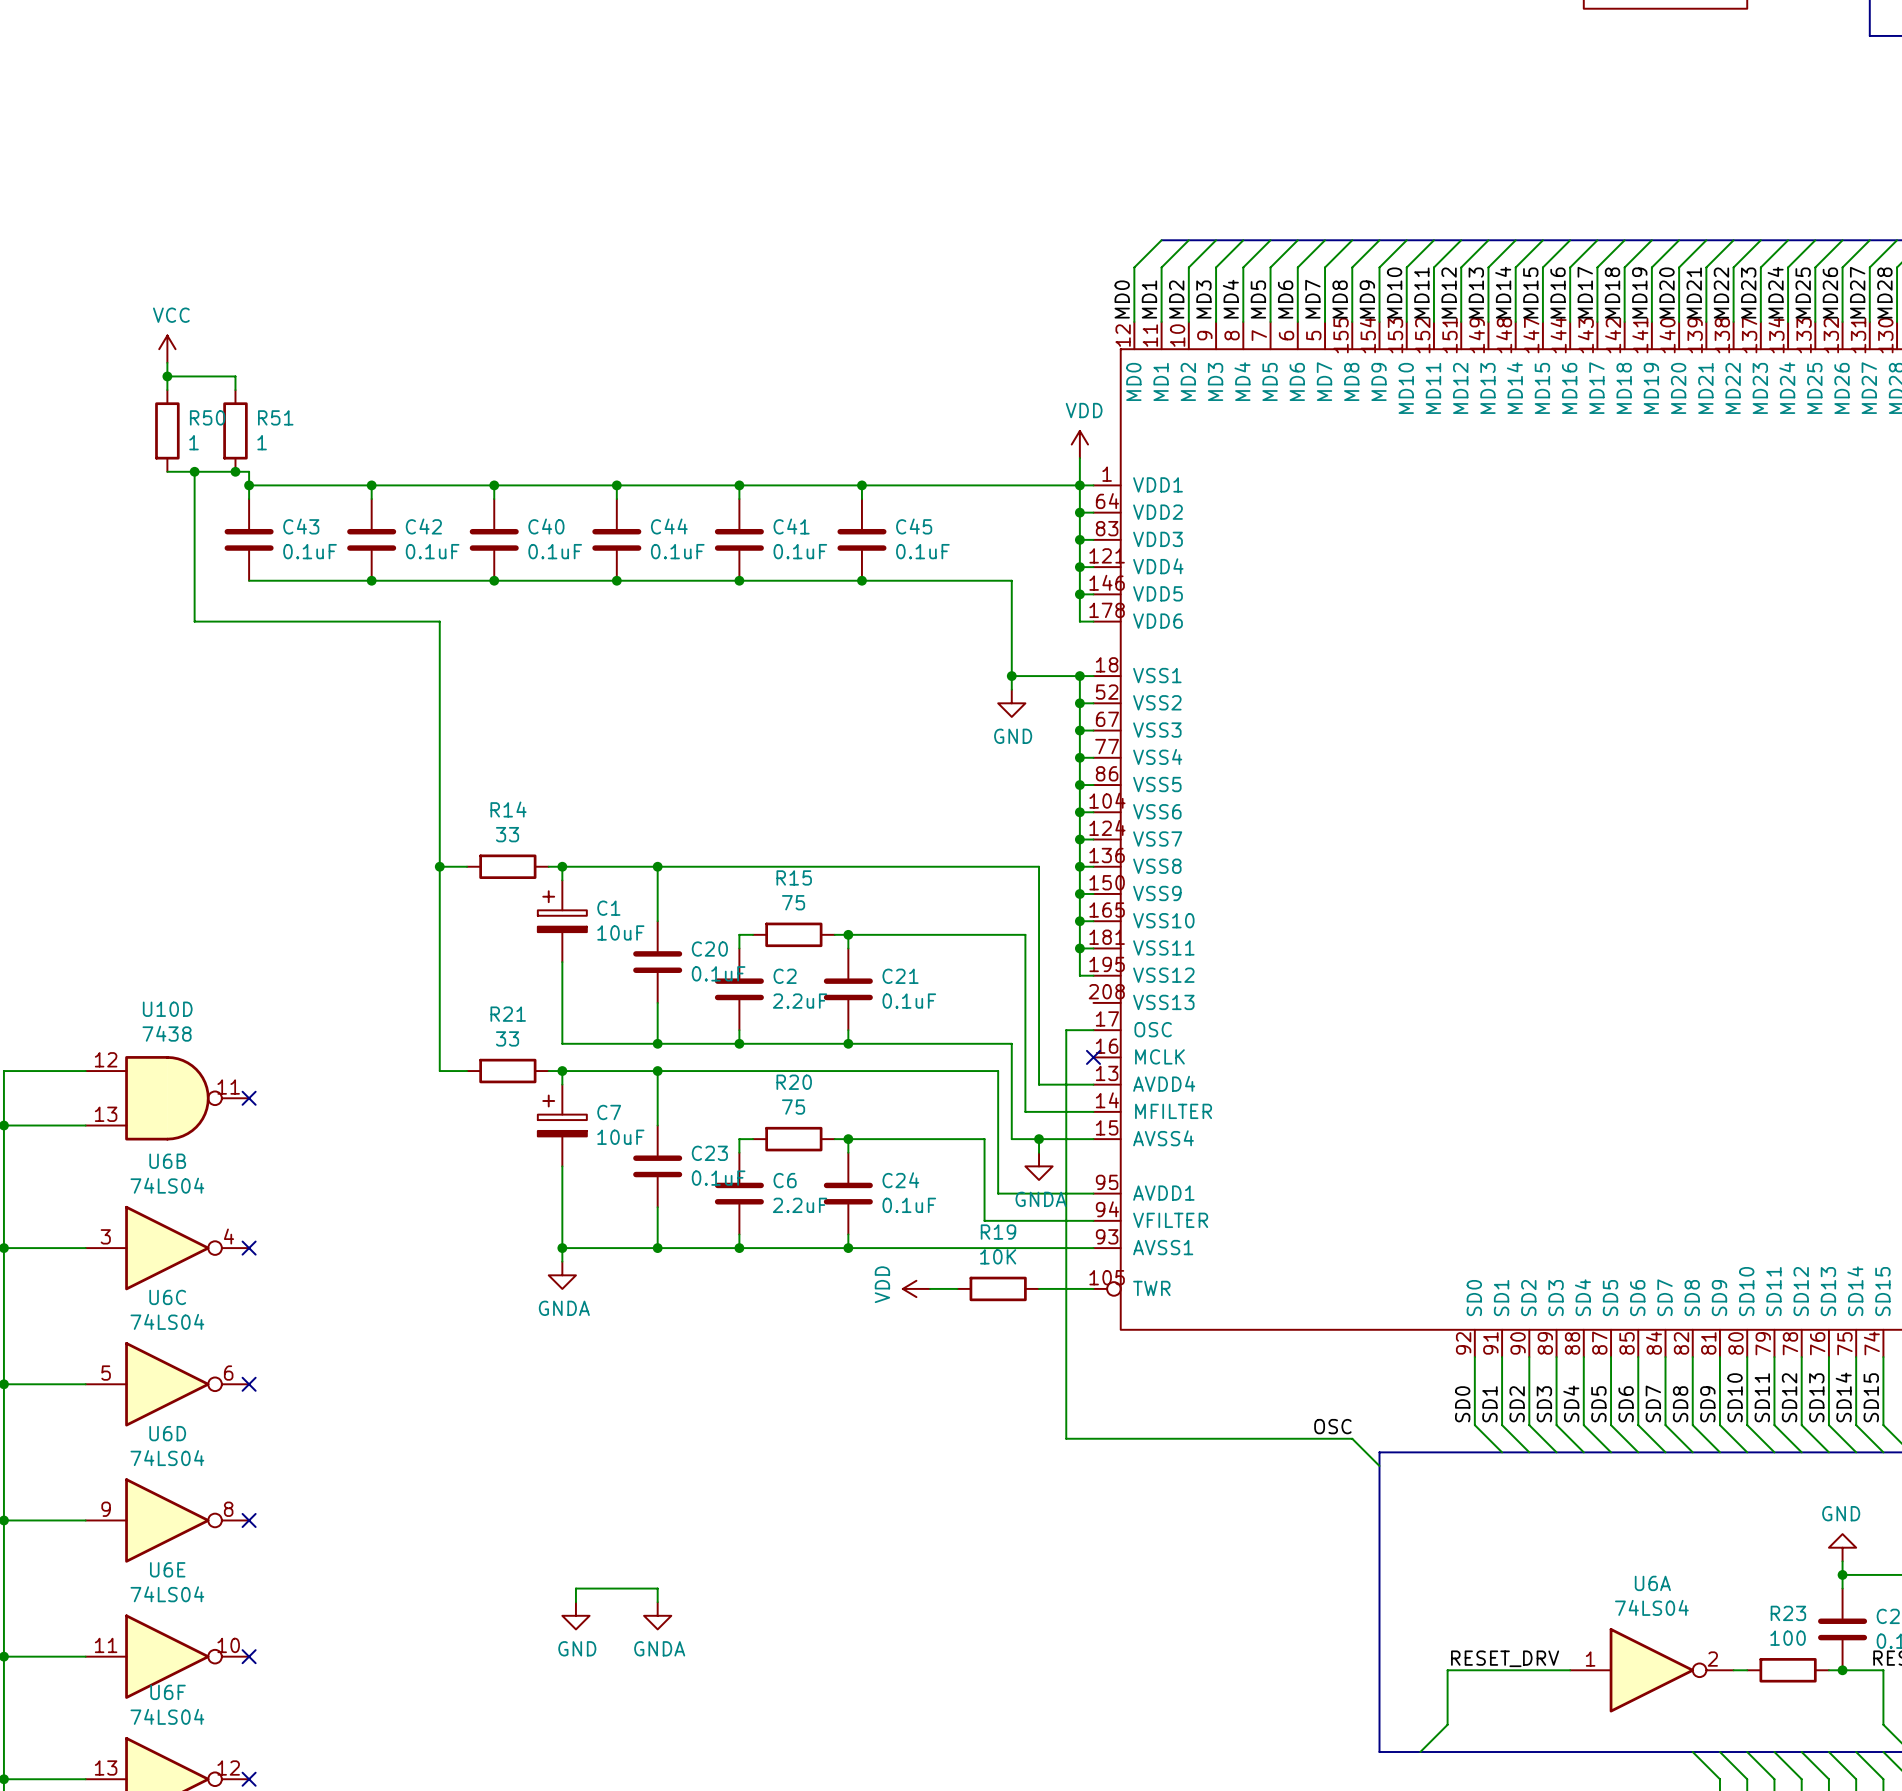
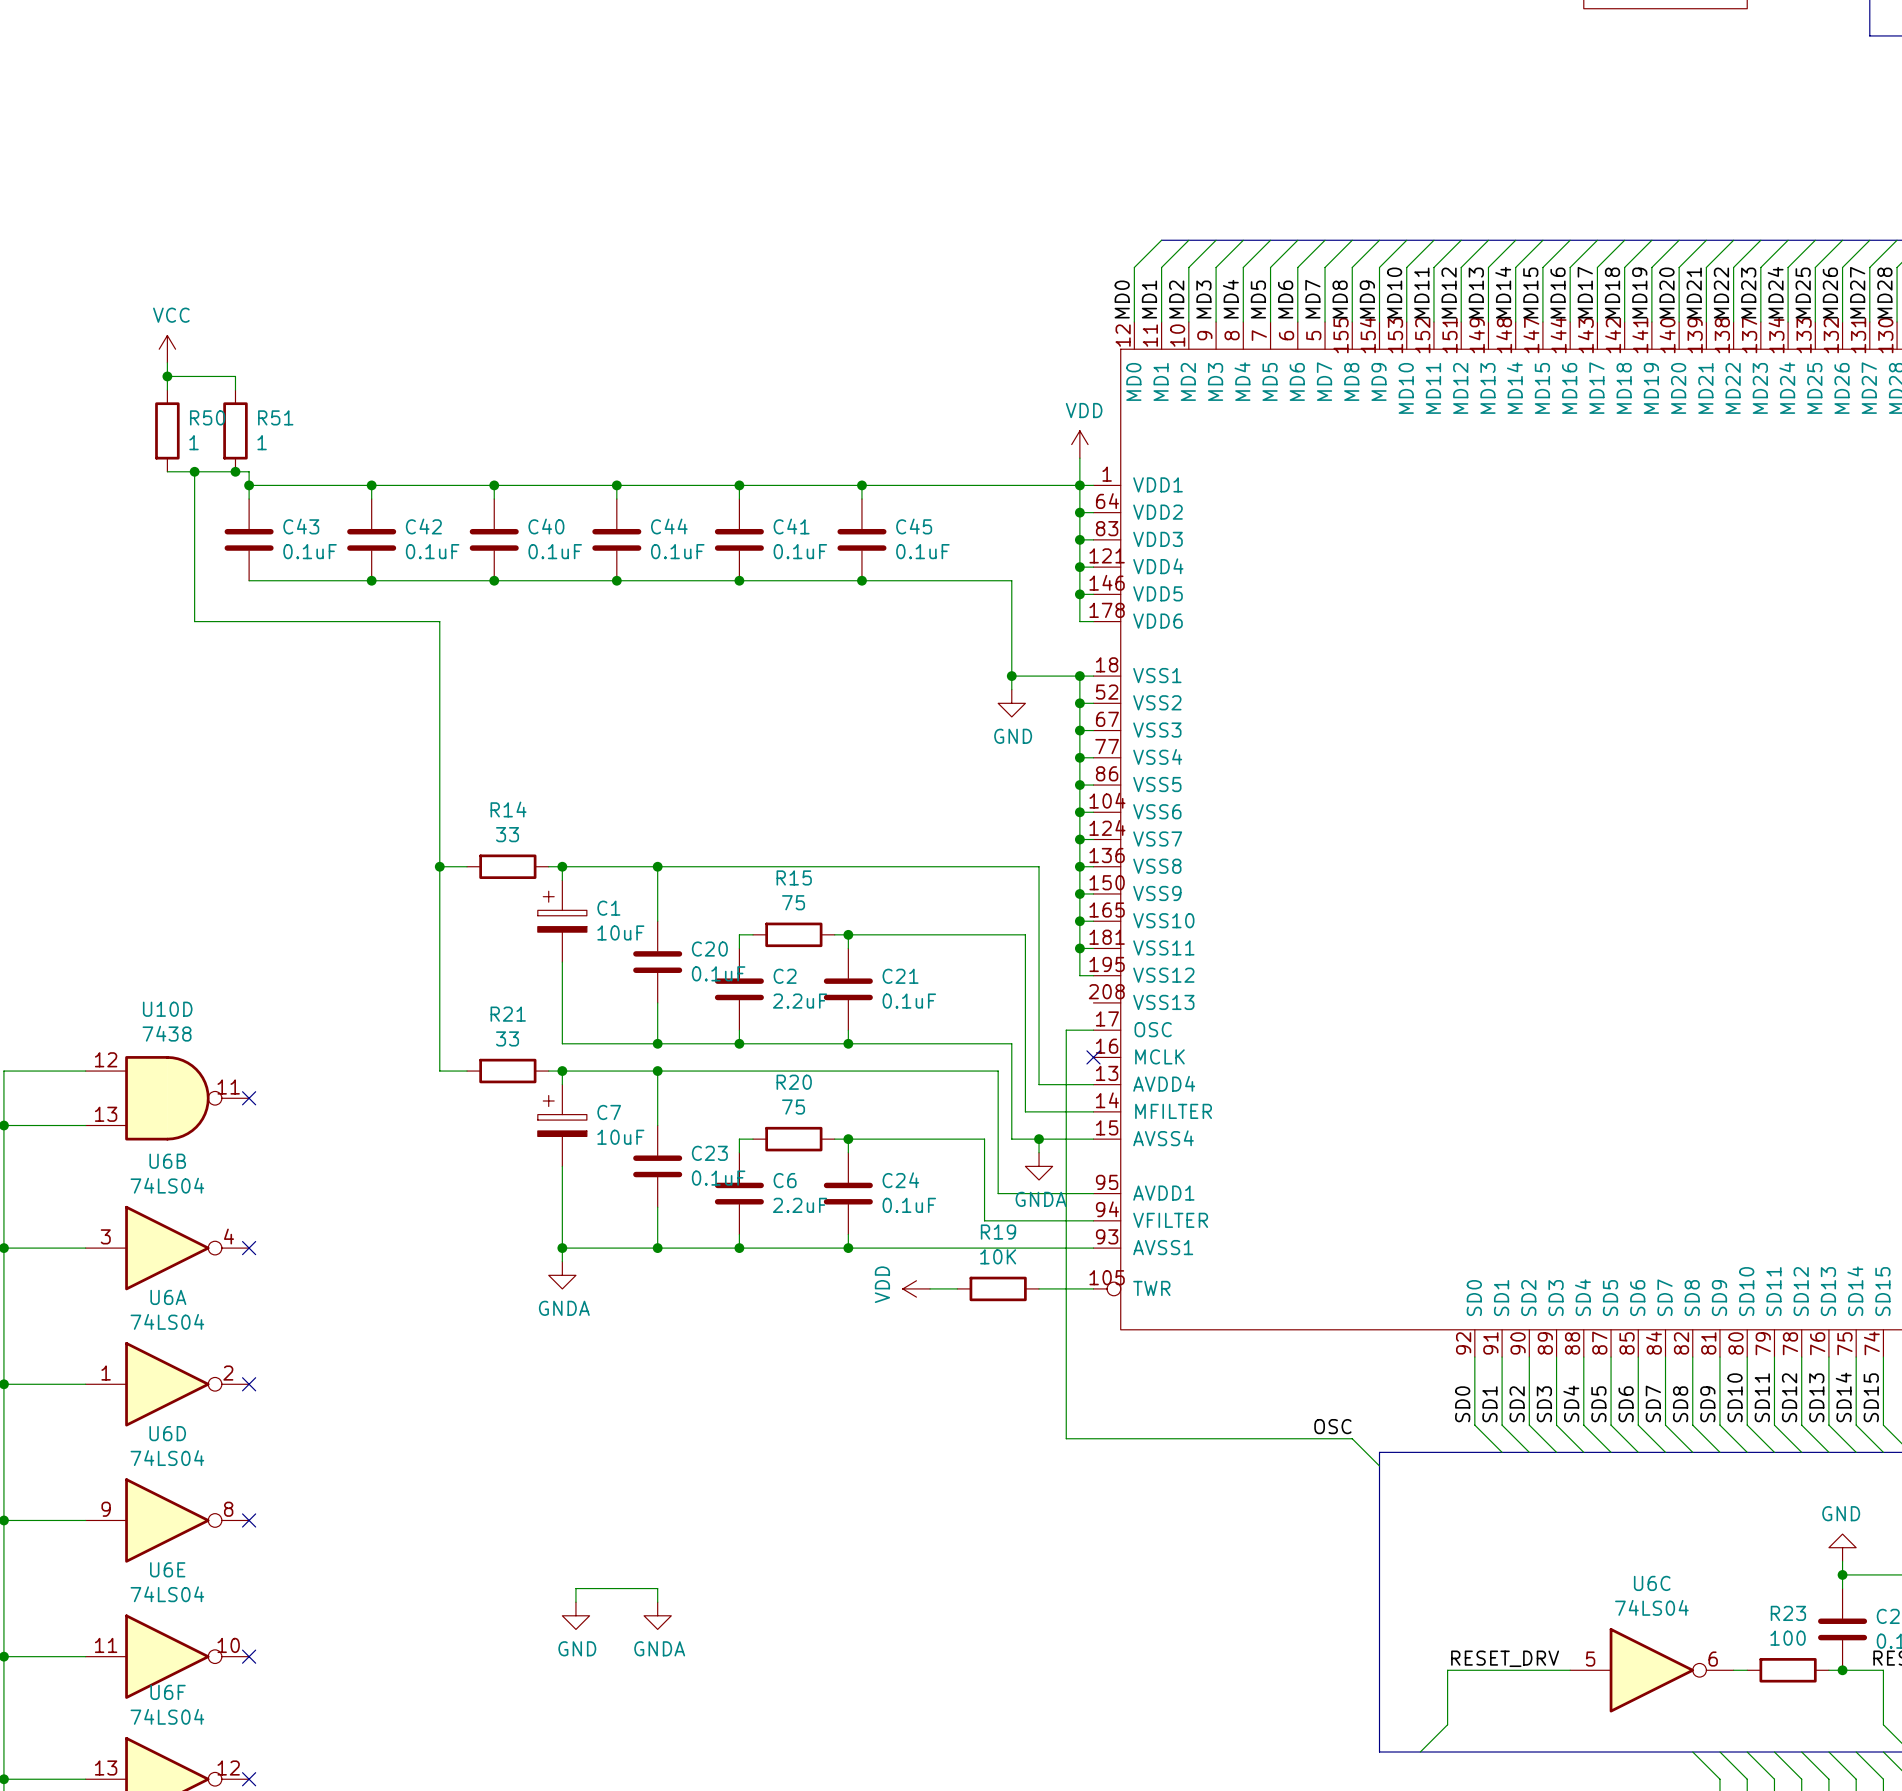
U6C position: (167, 1384) -> (1651, 1670)
U6A position: (1651, 1670) -> (167, 1384)

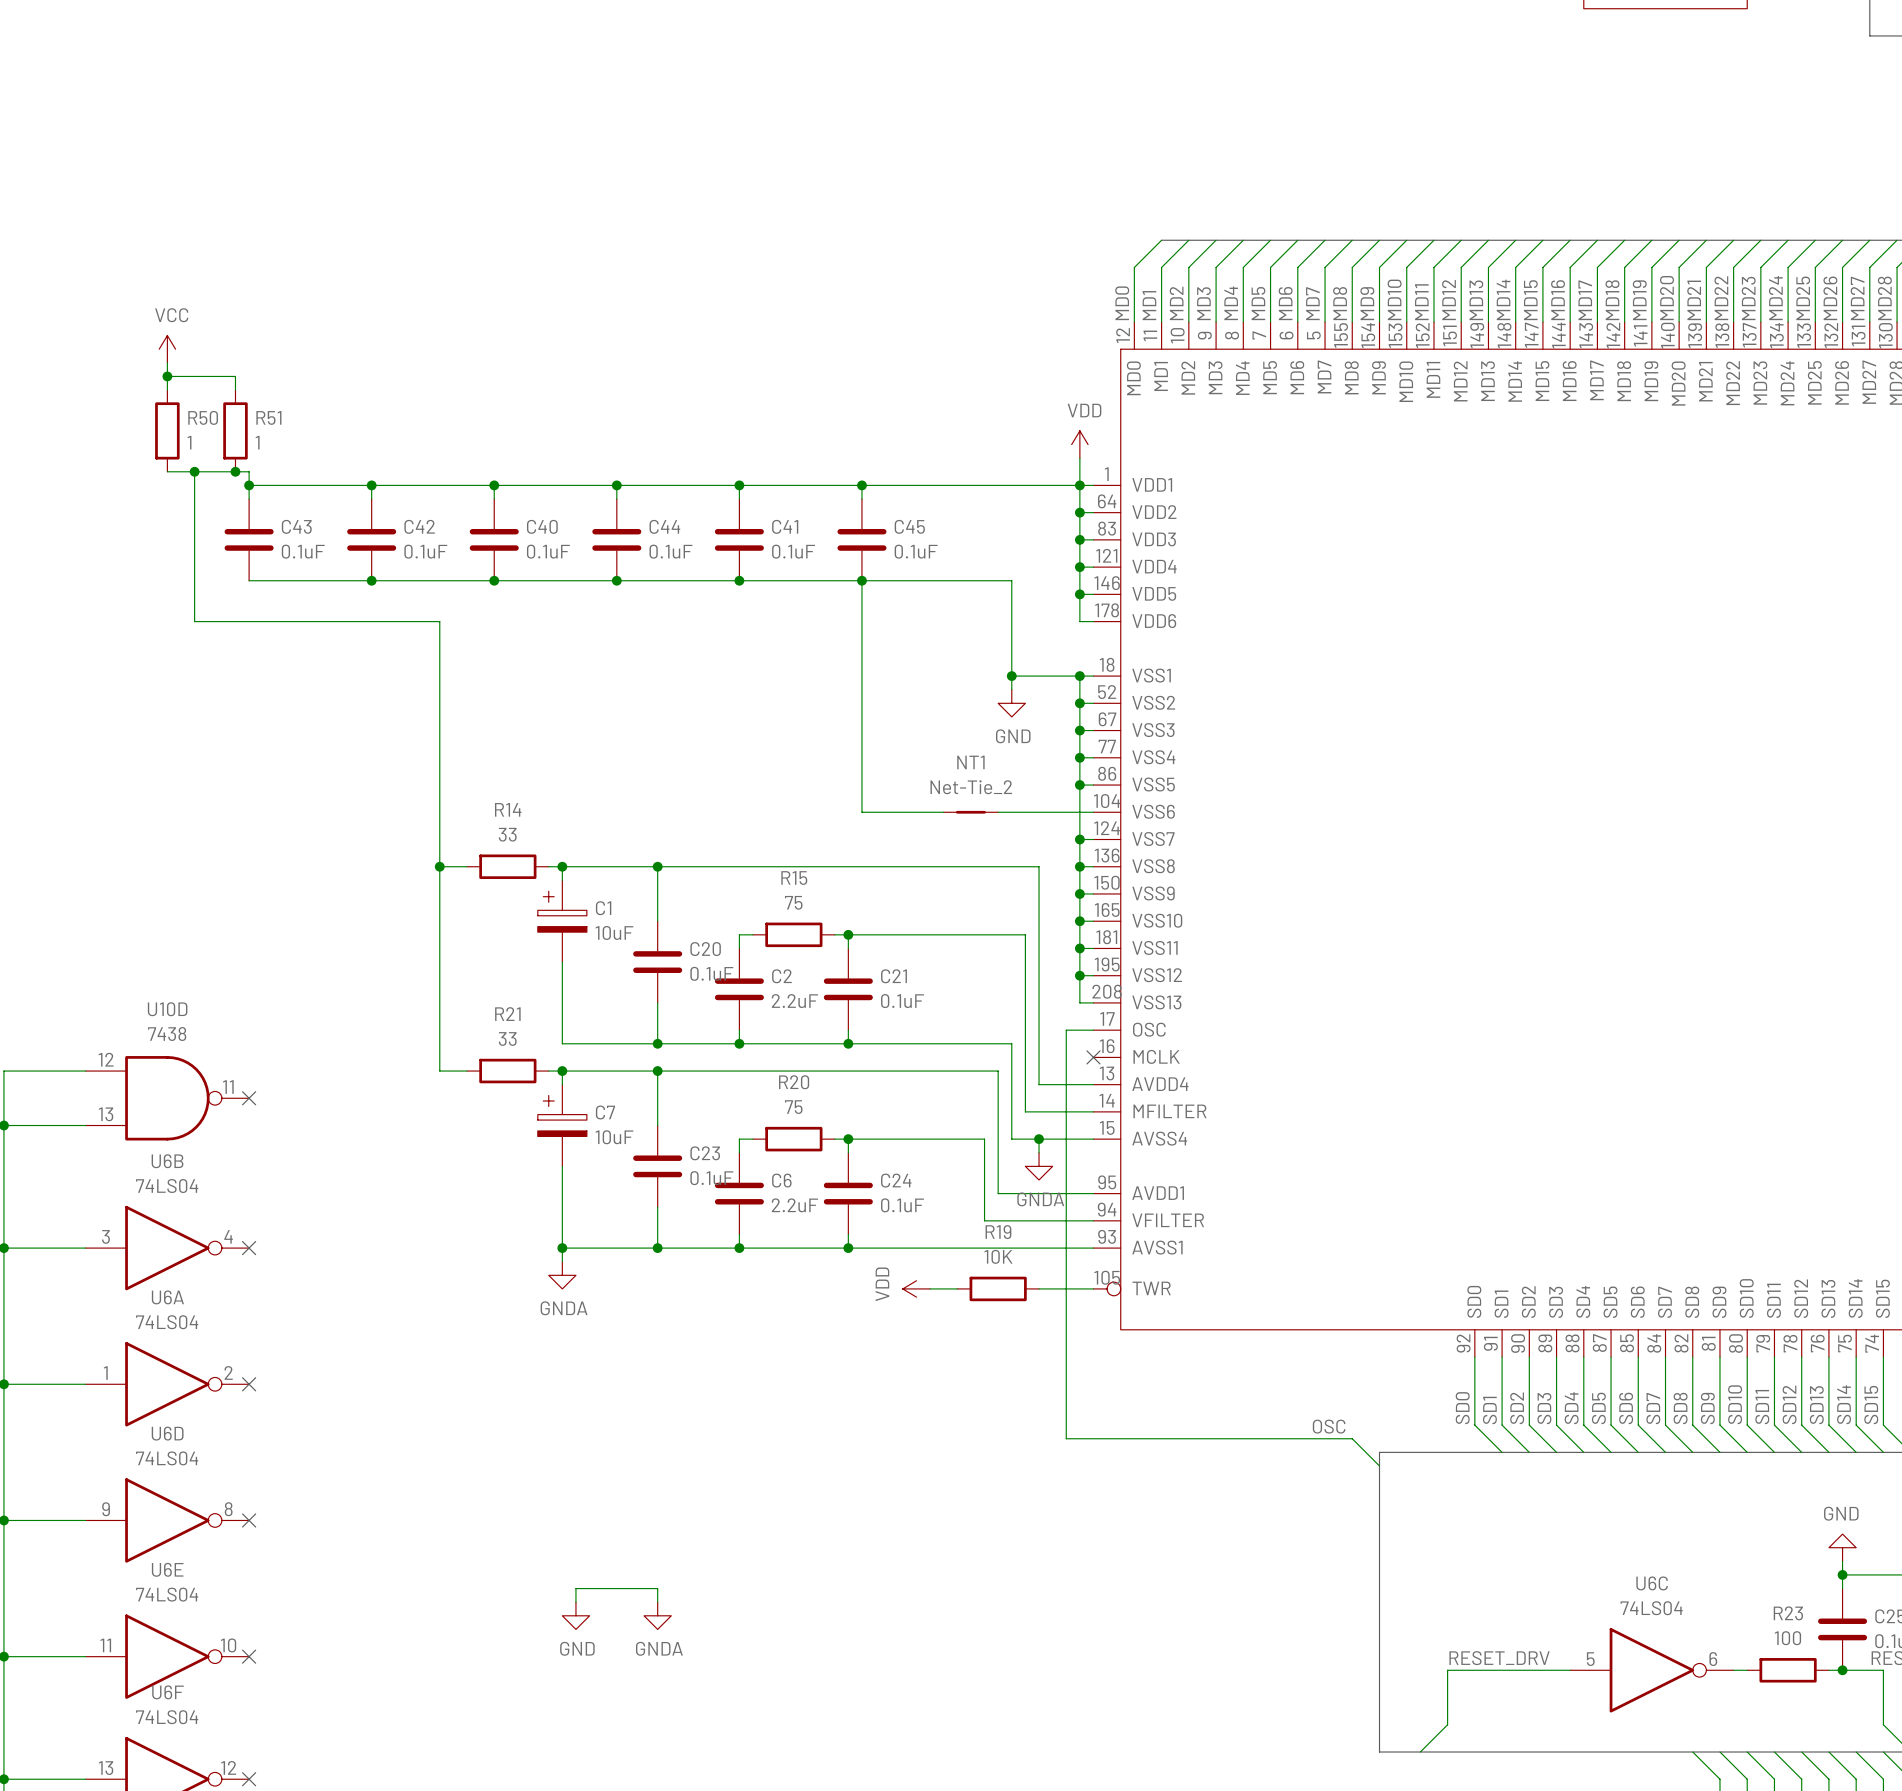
wire: none -> (861, 580) (861, 812) (943, 812)
NT1: none -> Net-Tie_2 (970, 812)
wire: none -> (998, 812) (1079, 812)
junction: (1079, 812) -> none
wire: none -> (1079, 975) (1079, 1002) (1093, 1002)
junction: none -> (1079, 975)

